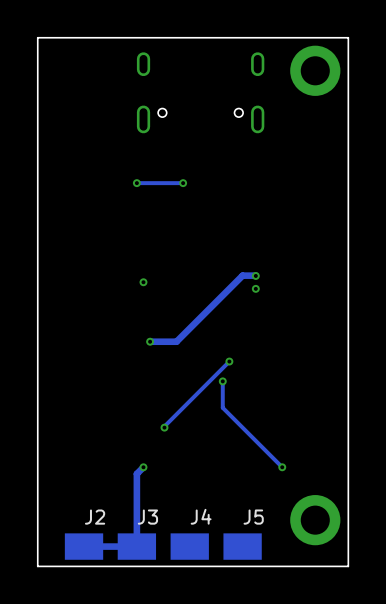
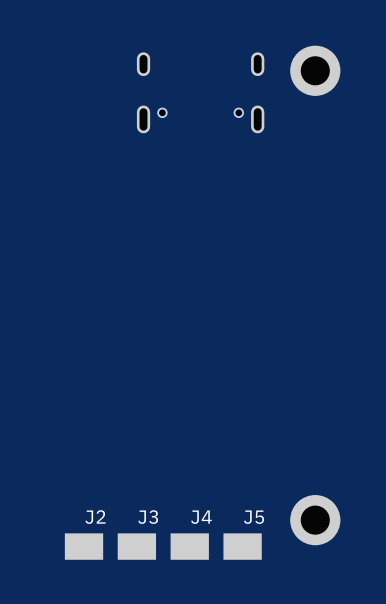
board edge: (348, 37) (37, 37) (37, 566) (348, 566) (348, 37) -> none
via: (136, 183) -> none
track: (183, 183) (136, 183) -> none
via: (183, 183) -> none
track: (255, 275) (242, 275) (176, 341) (150, 341) -> none
via: (255, 275) -> none
via: (143, 282) -> none
via: (255, 288) -> none
via: (150, 341) -> none
track: (229, 361) (164, 427) -> none
via: (229, 361) -> none
track: (222, 381) (222, 407) (282, 467) -> none
via: (222, 381) -> none
via: (164, 427) -> none
track: (143, 467) (136, 473) (136, 546) (84, 546) -> none
via: (143, 467) -> none
via: (282, 467) -> none

